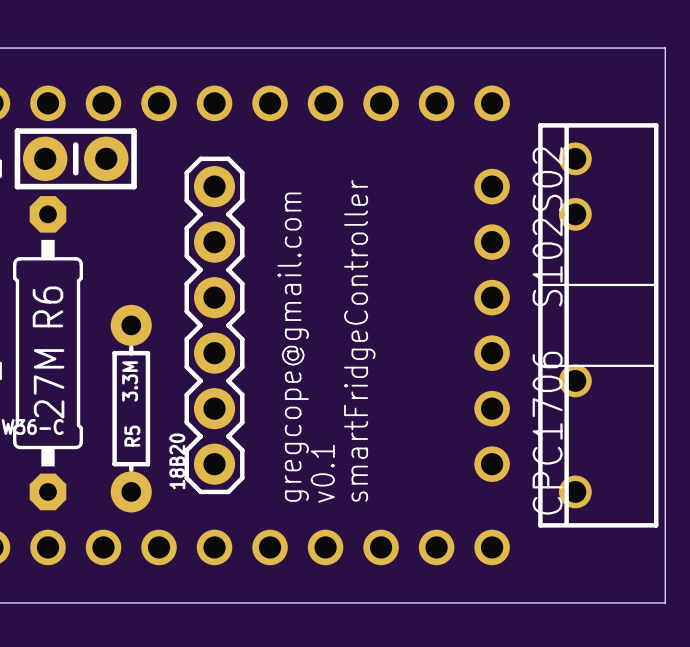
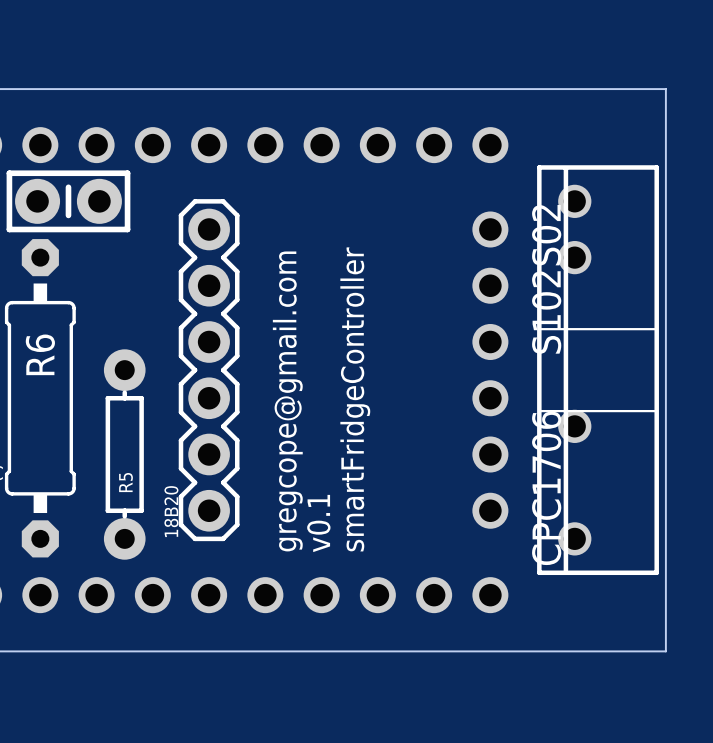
R5 value: 3.3M (130, 381) -> none
R6 value: 27M (49, 383) -> none

